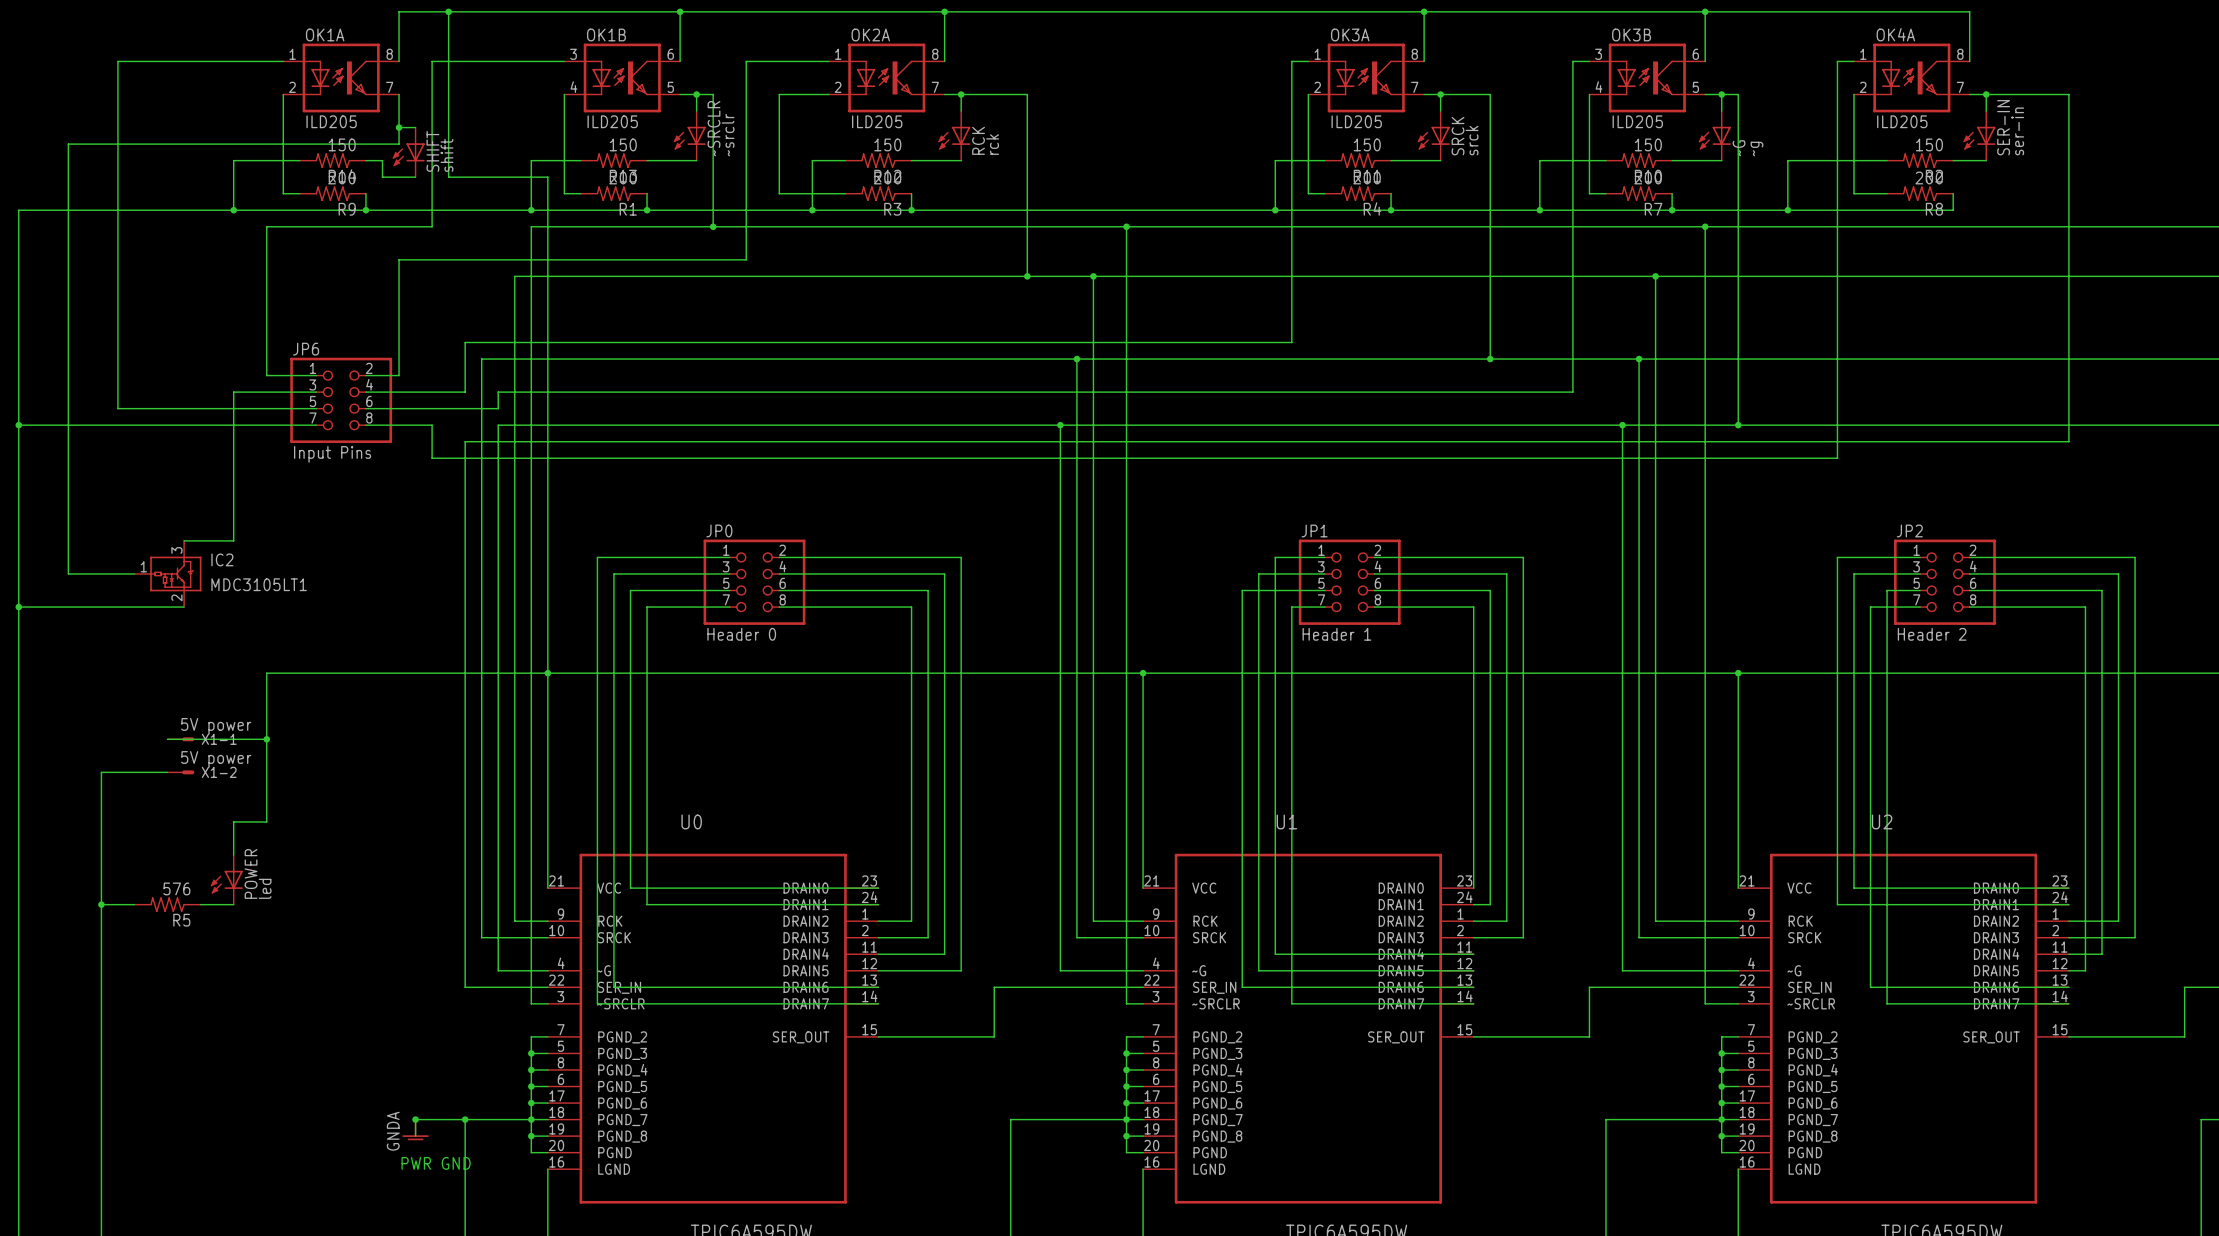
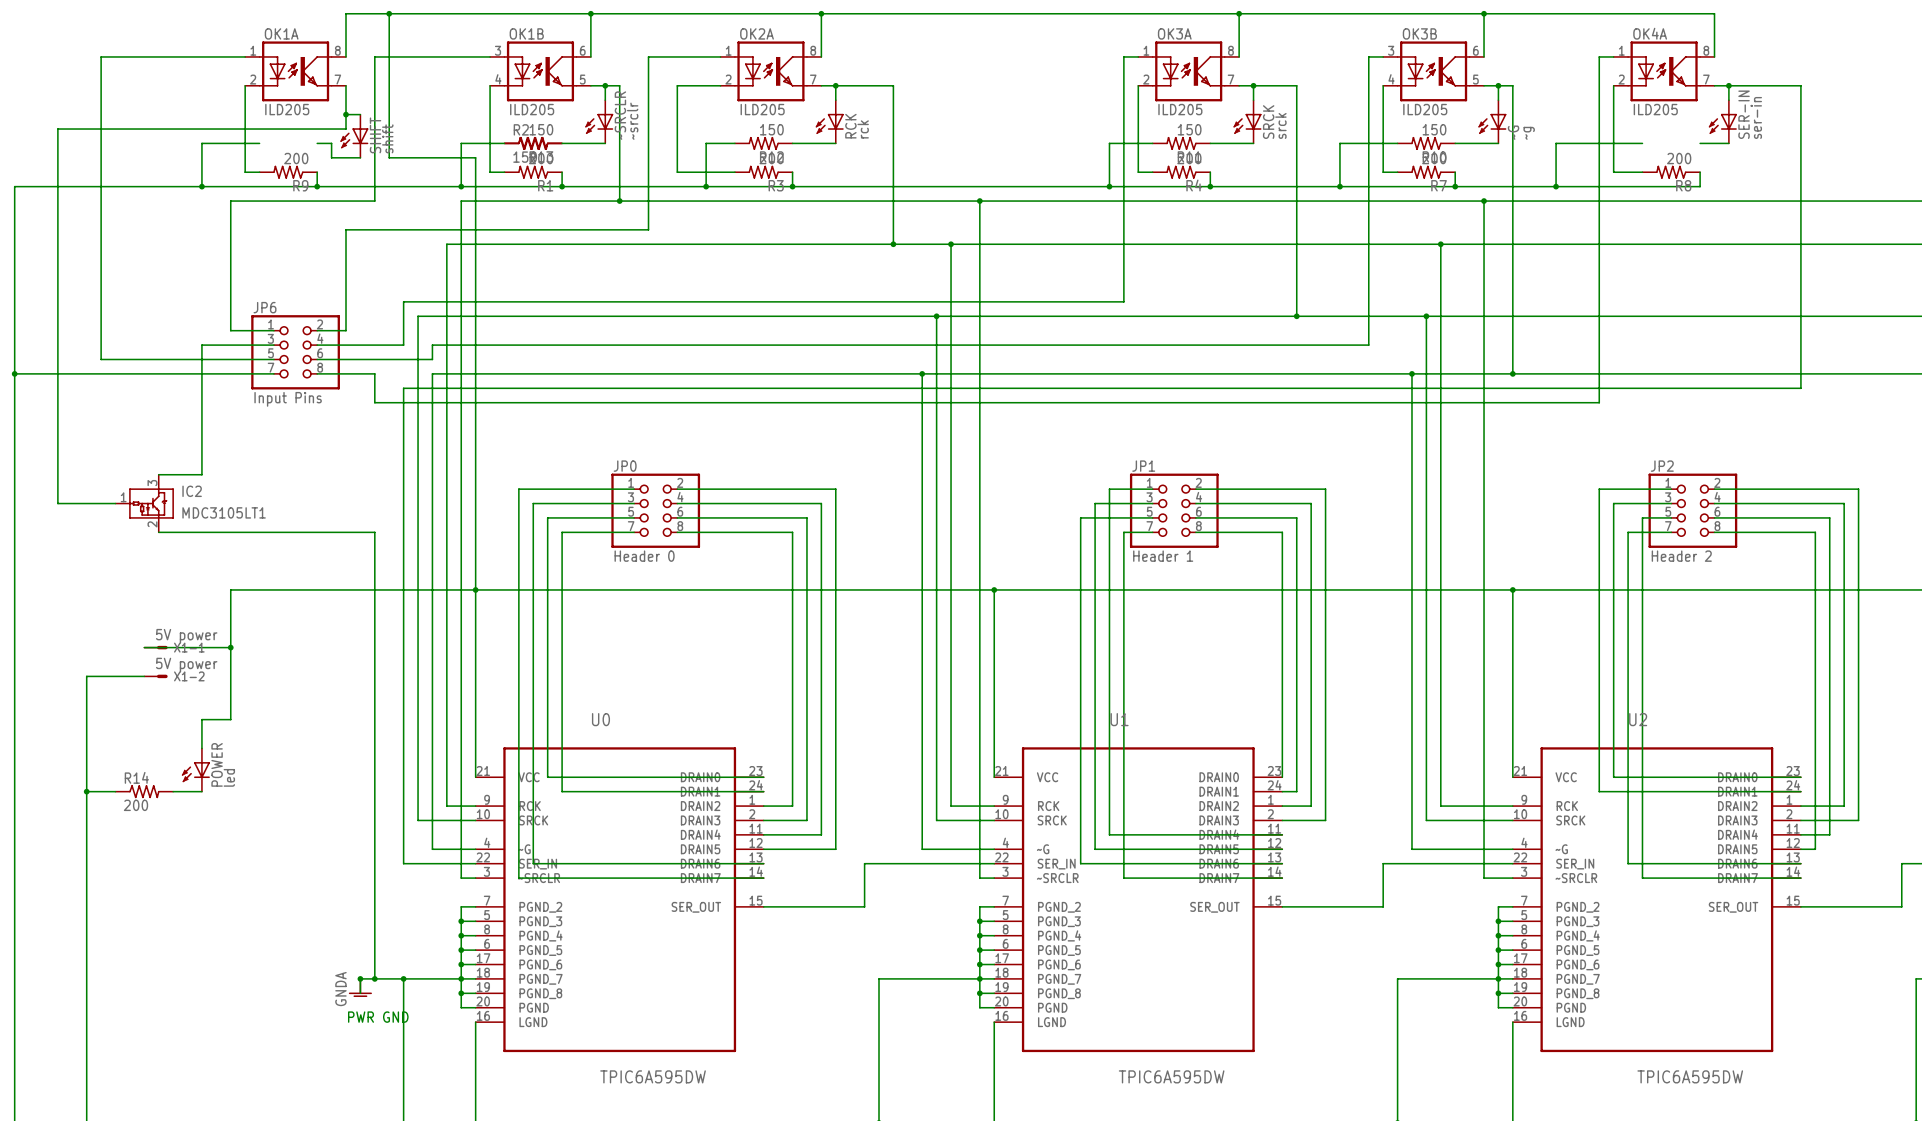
R14 value: 150 (342, 144) -> 200 (136, 805)
R14 rotation: 0° (332, 160) -> 180° (144, 791)
R14 position: (332, 160) -> (144, 791)
R2 rotation: 0° (1920, 160) -> 180° (533, 143)
R2 position: (1920, 160) -> (533, 143)
wire: (18, 607) (184, 607) -> (374, 978) (374, 532) (158, 532)
junction: (18, 607) -> none
R5: 576 (167, 904) -> none
junction: none -> (374, 978)

